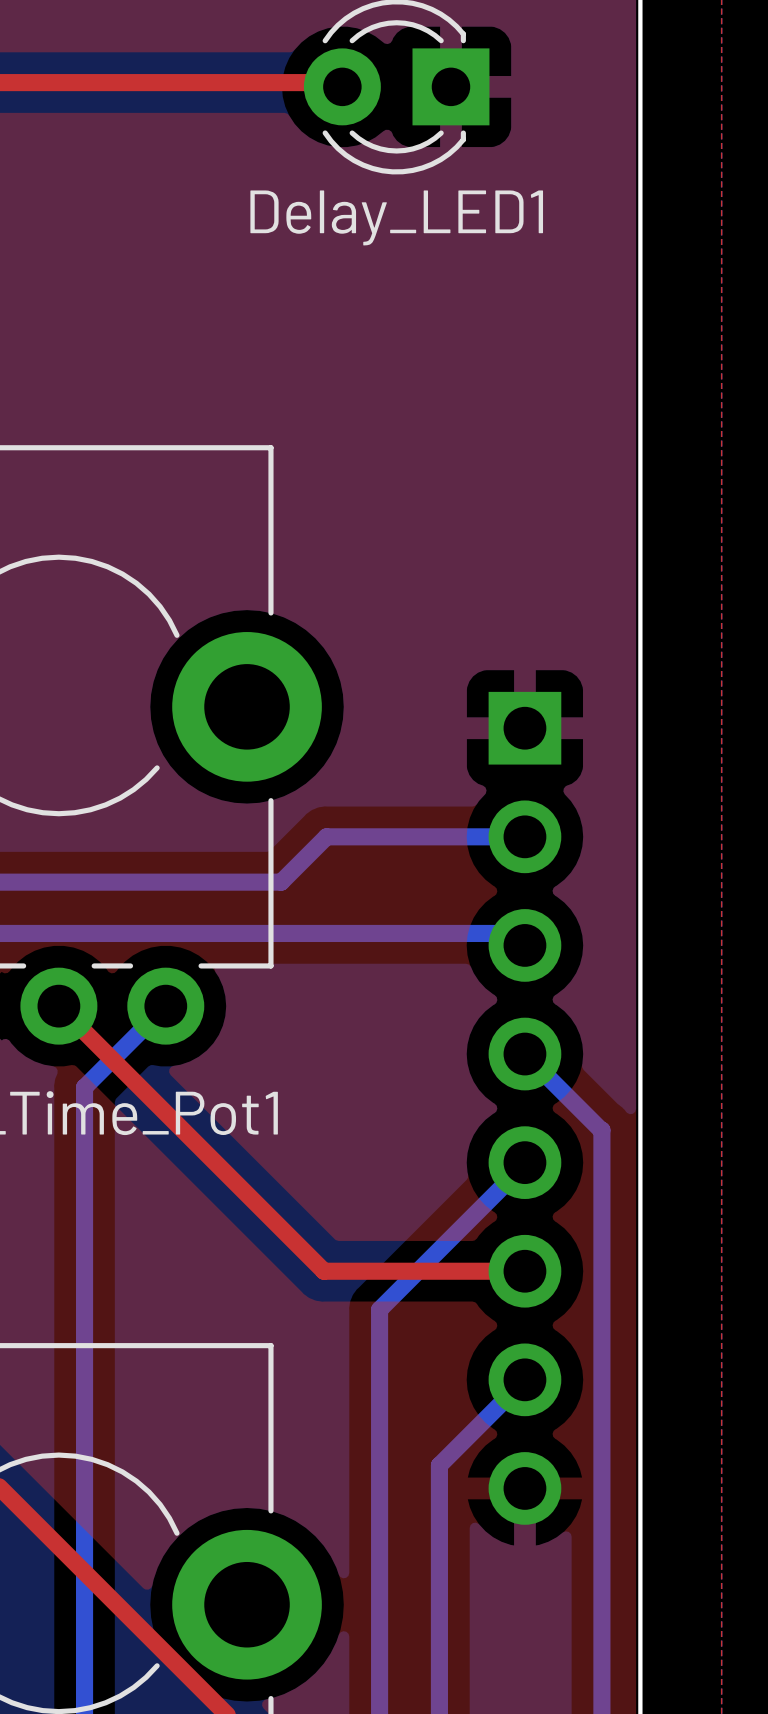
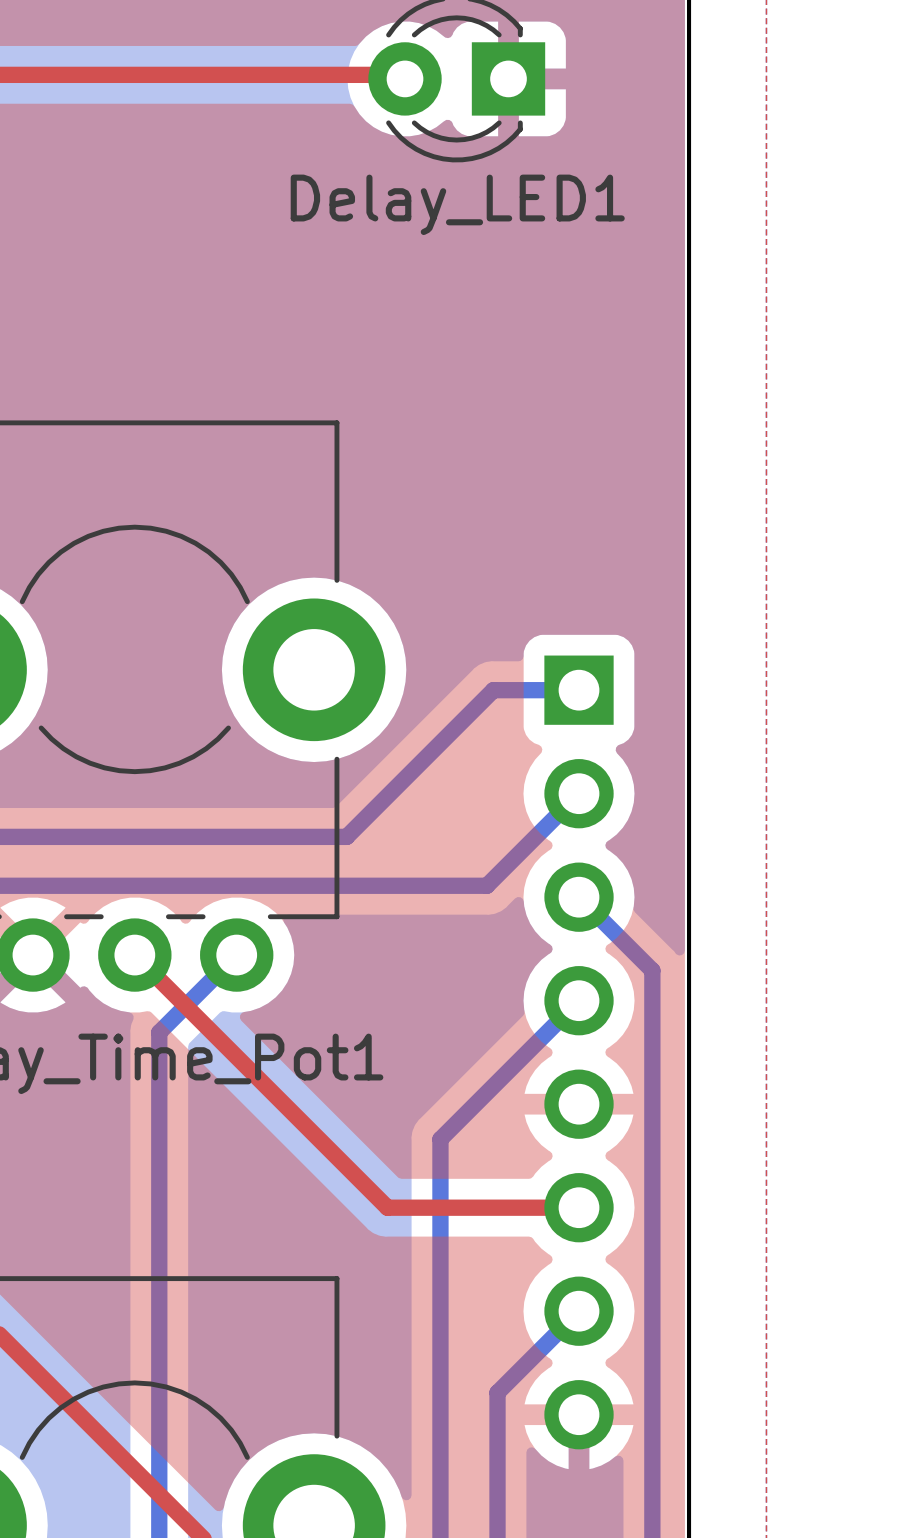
bottom track: (326, 836) (524, 836) -> (389, 793) (493, 690) (579, 690)
bottom track: (428, 933) (512, 933) (524, 945) -> (486, 885) (579, 793)
bottom track: (524, 1054) (601, 1130) -> (579, 897) (652, 970) (652, 1073)
bottom track: (524, 1162) (379, 1309) -> (579, 1000) (440, 1139) (440, 1244)

